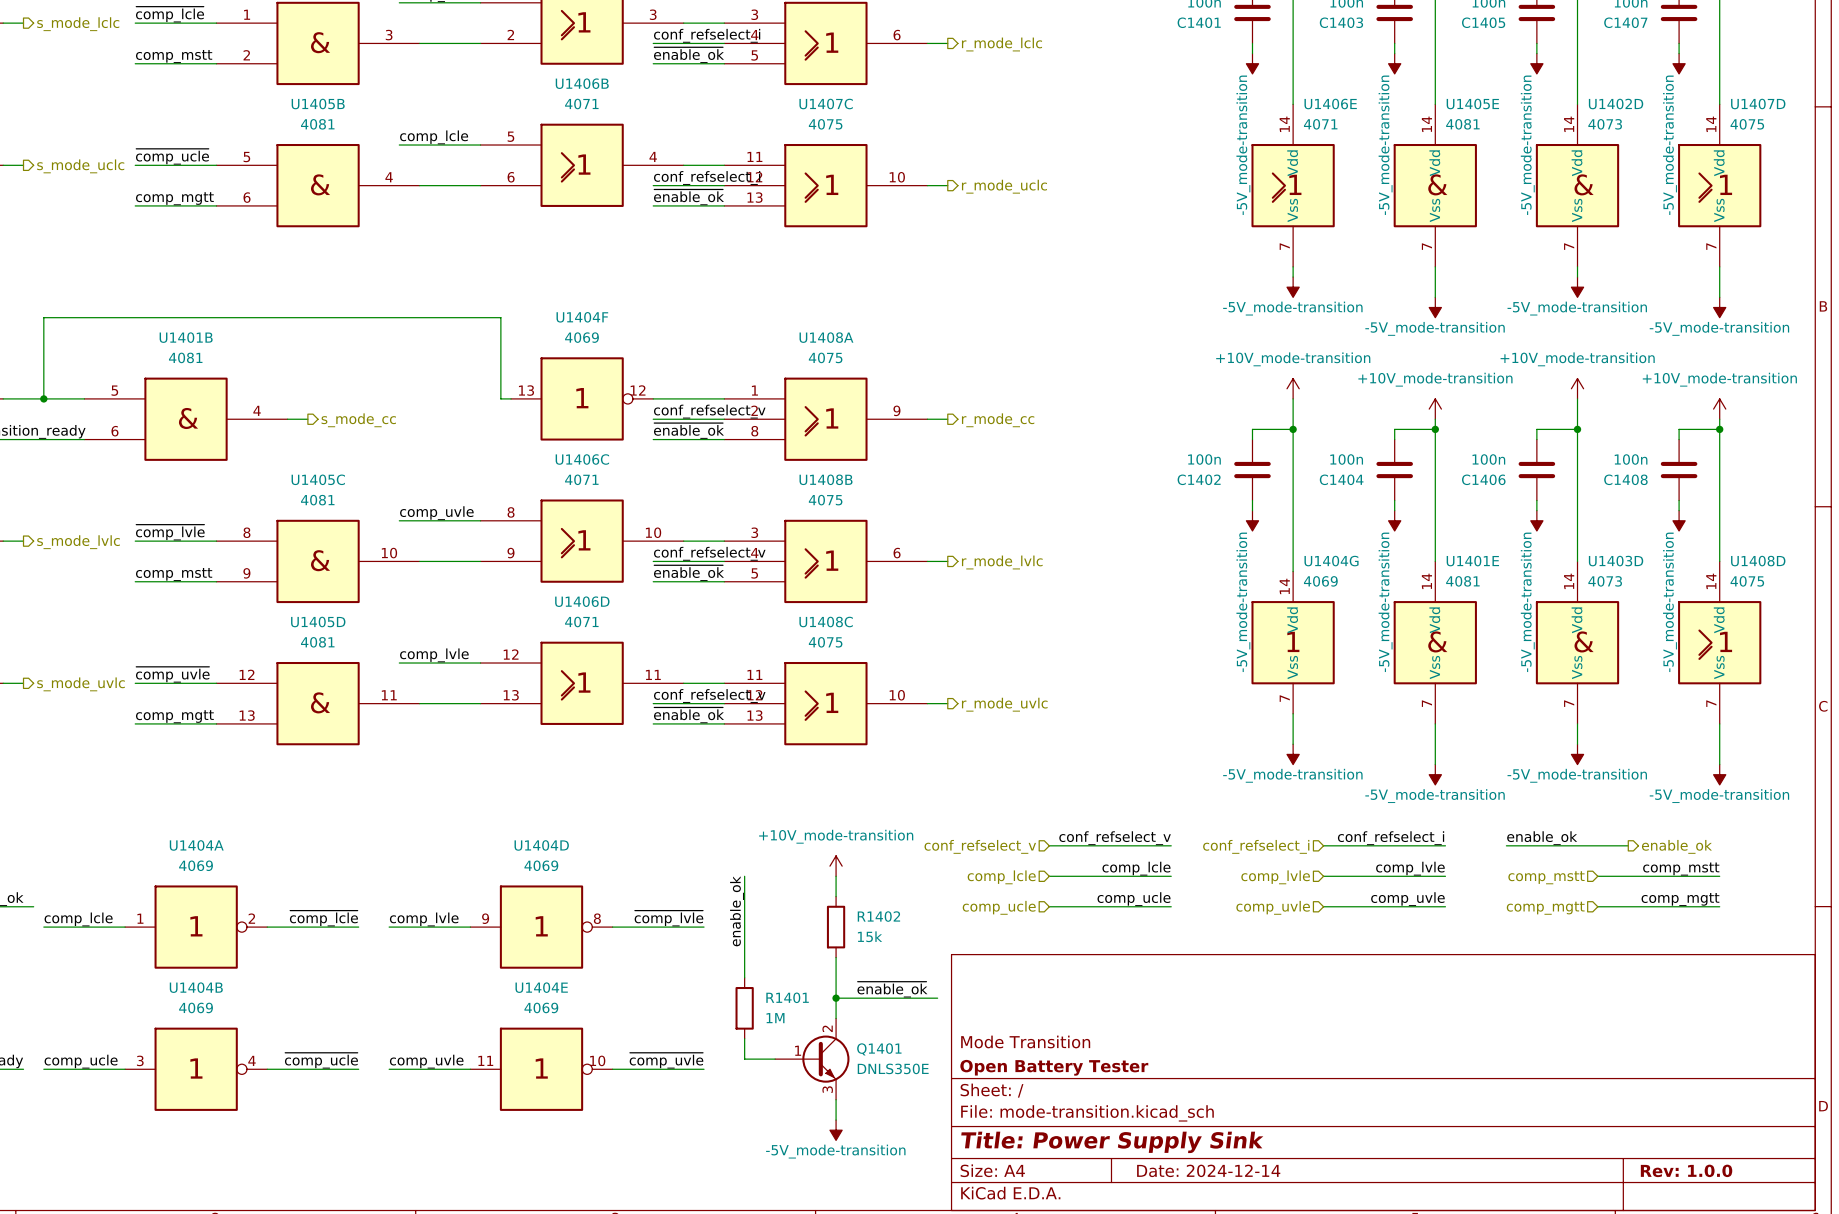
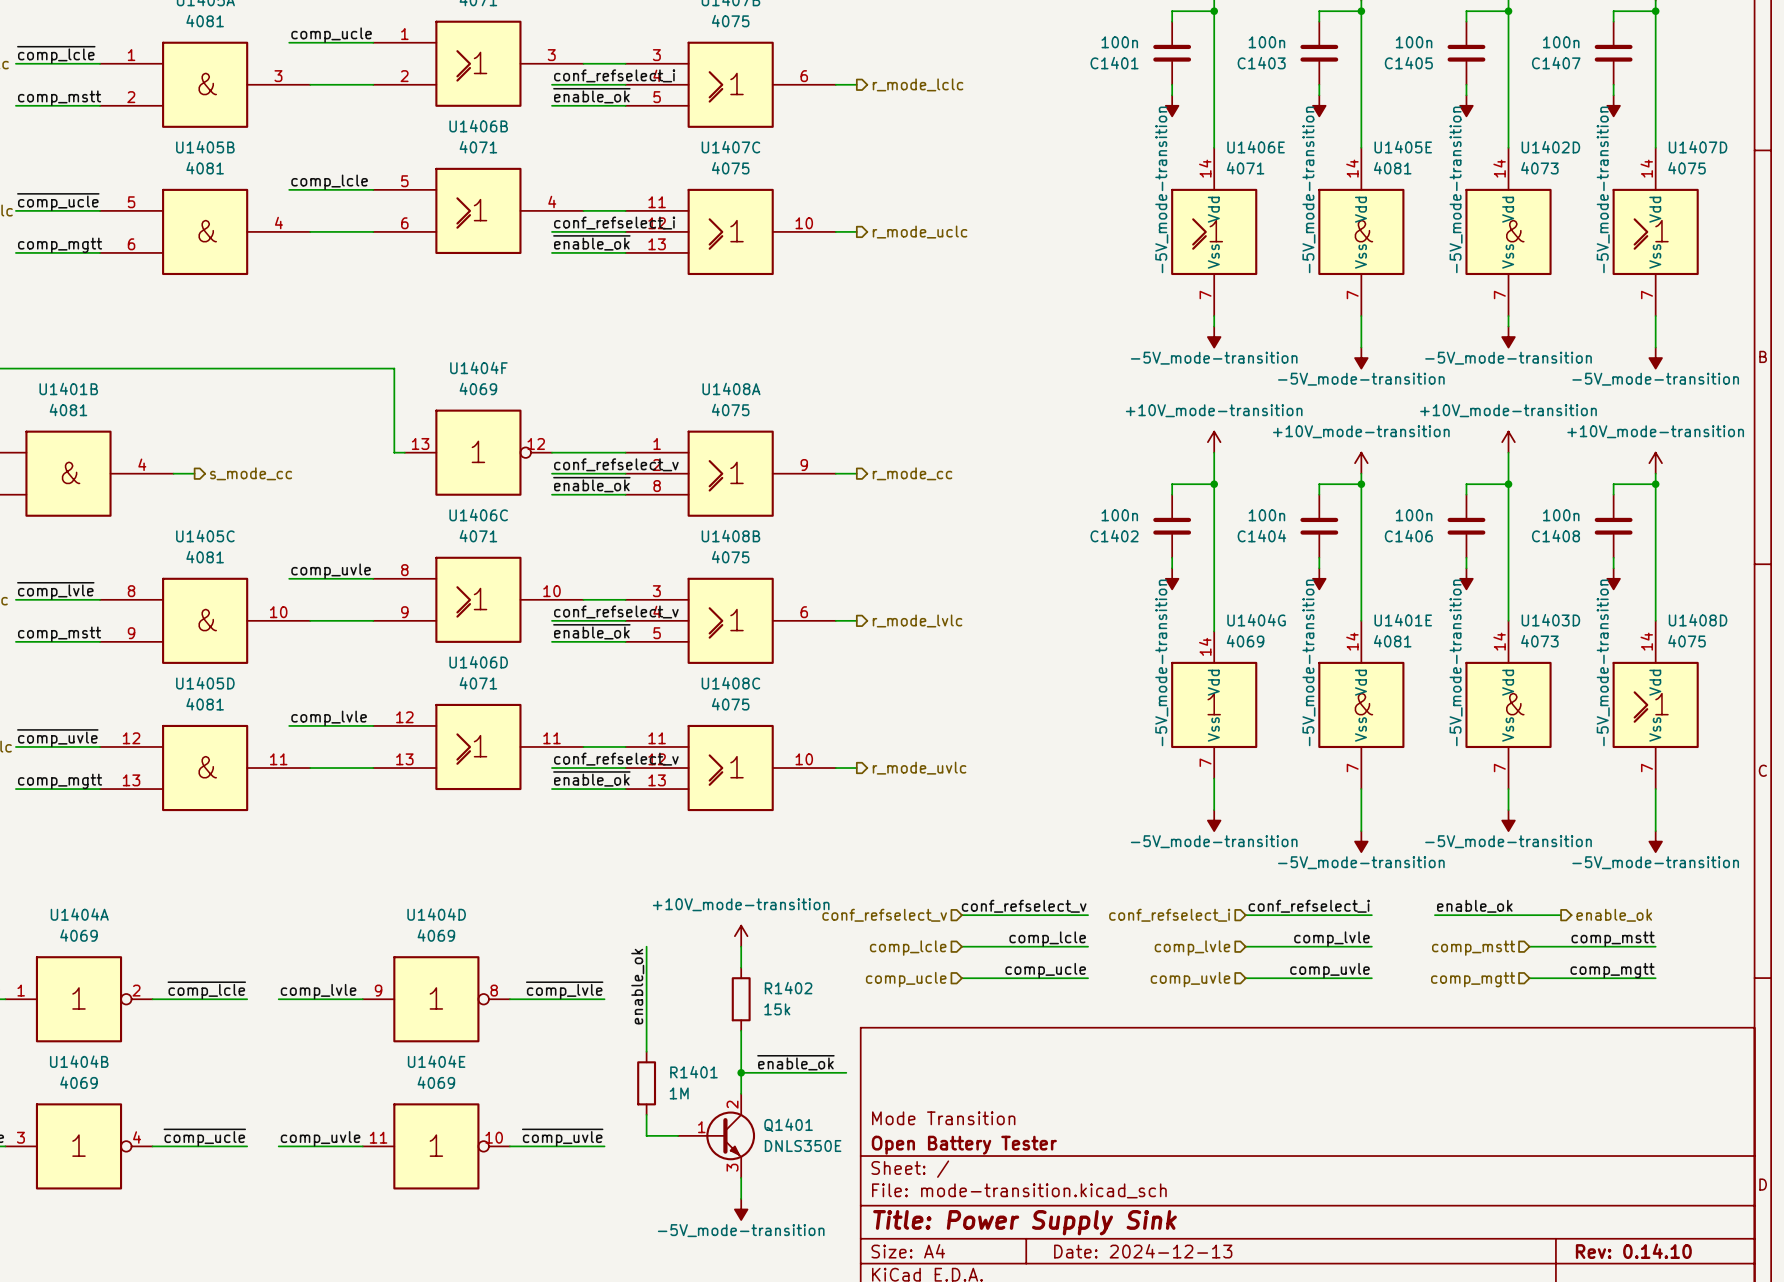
title block: Date: 2024-12-14 (1208, 1170) -> Date: 2024-12-13 (1143, 1251)
title block: Rev: 1.0.0 (1686, 1170) -> Rev: 0.14.10 (1633, 1251)

